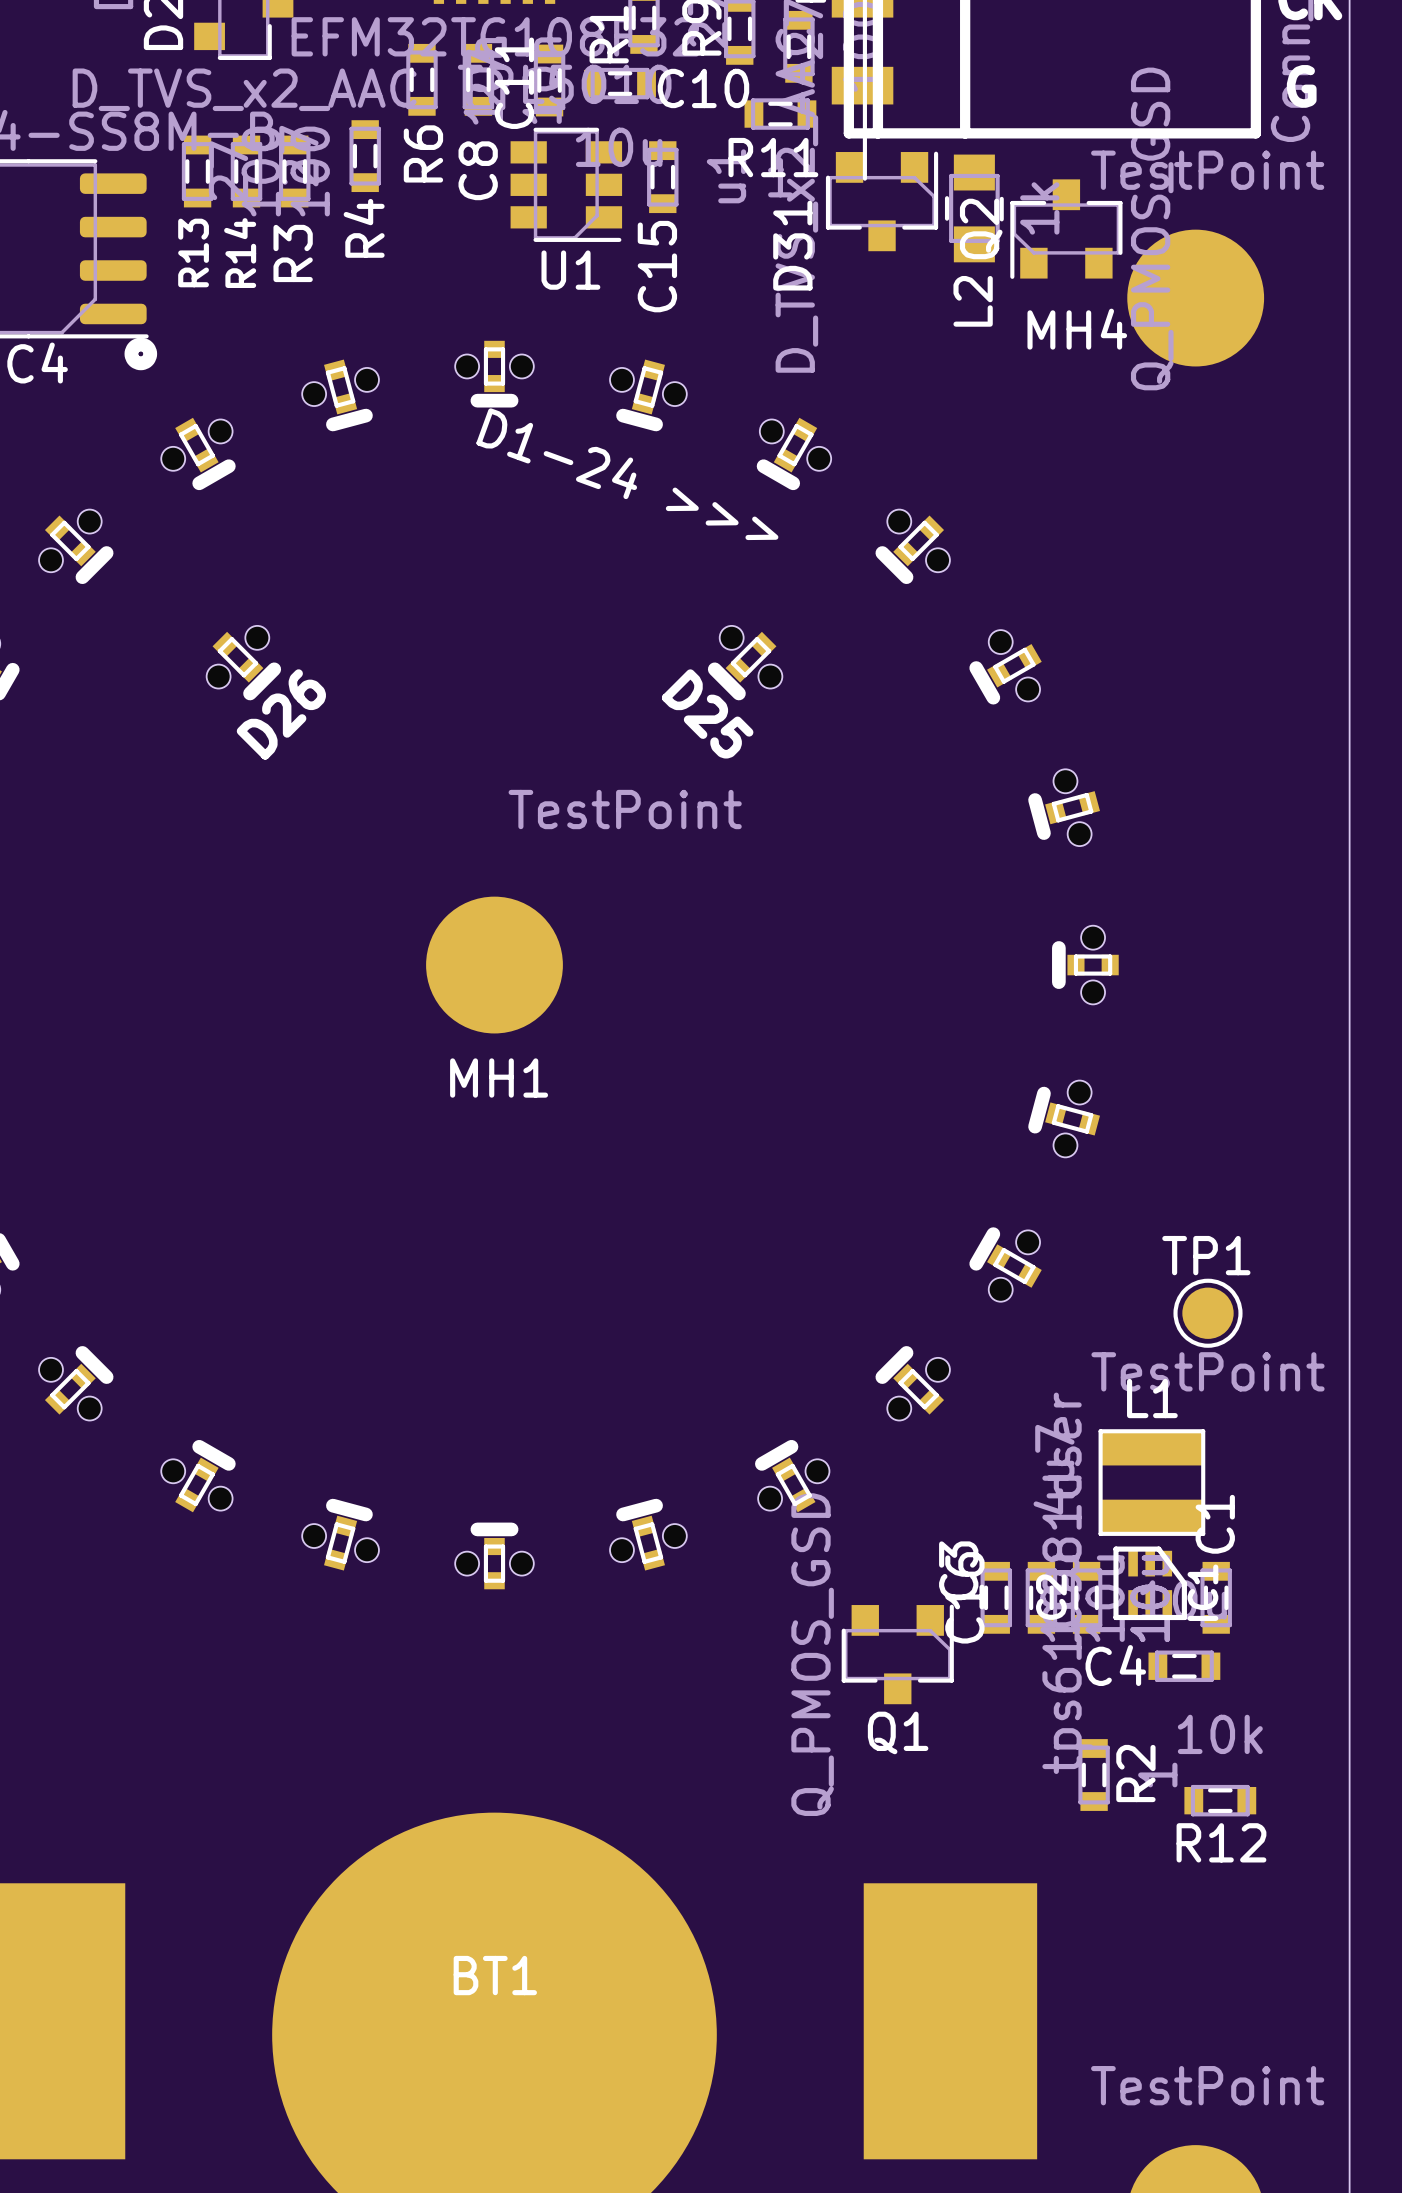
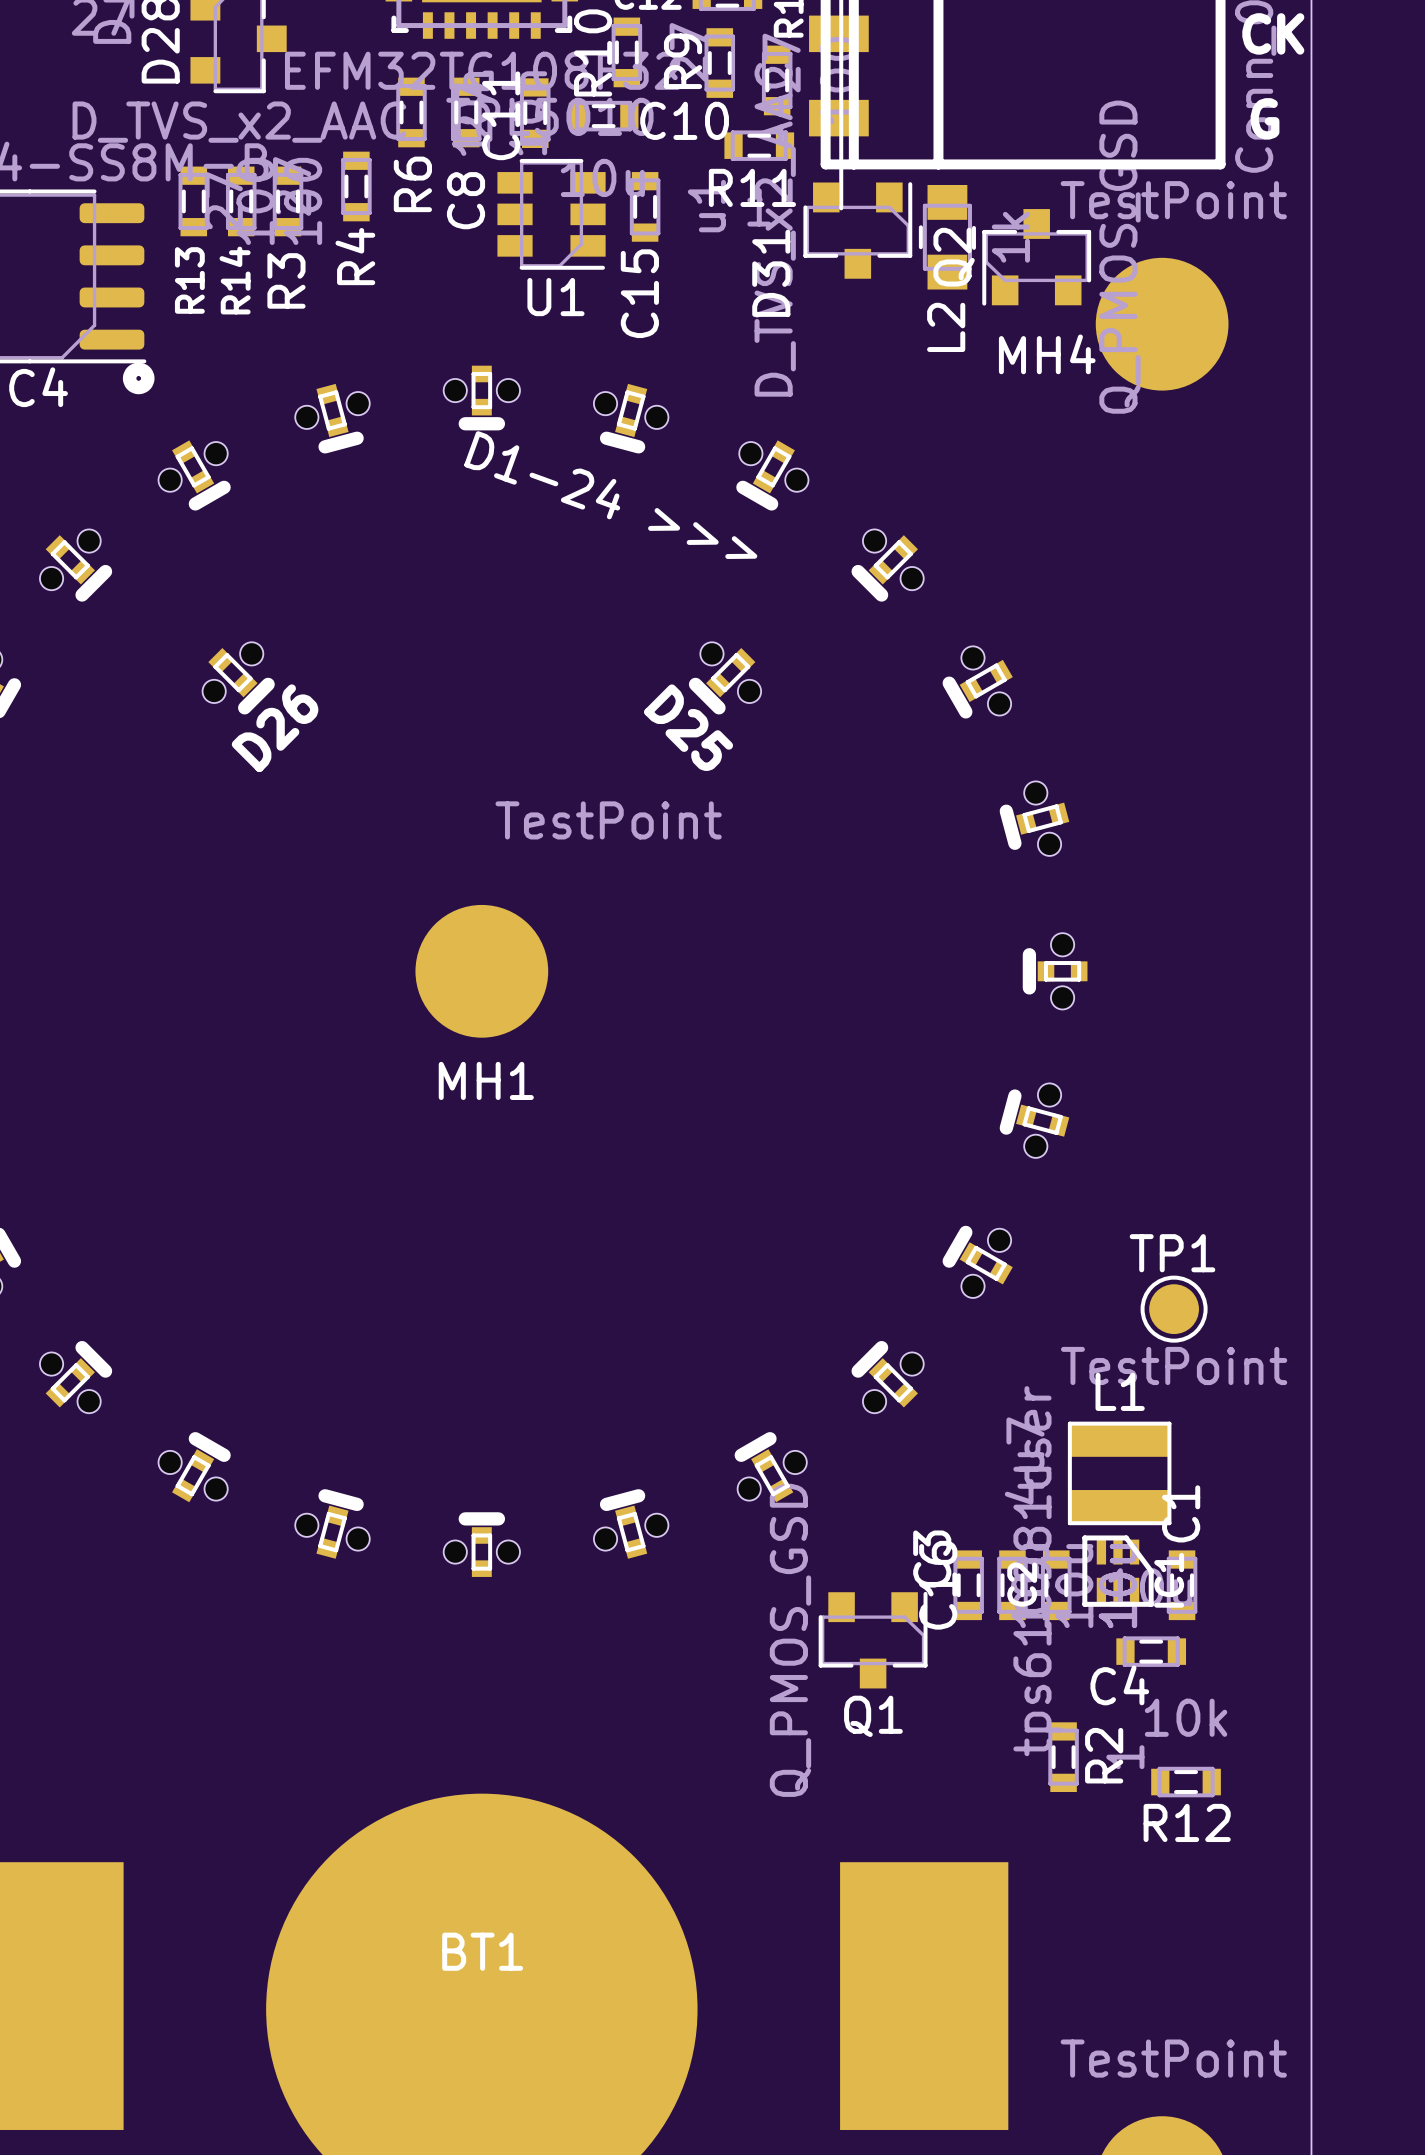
C4 name position: C4 (1115, 1665) -> C4 (1119, 1685)

